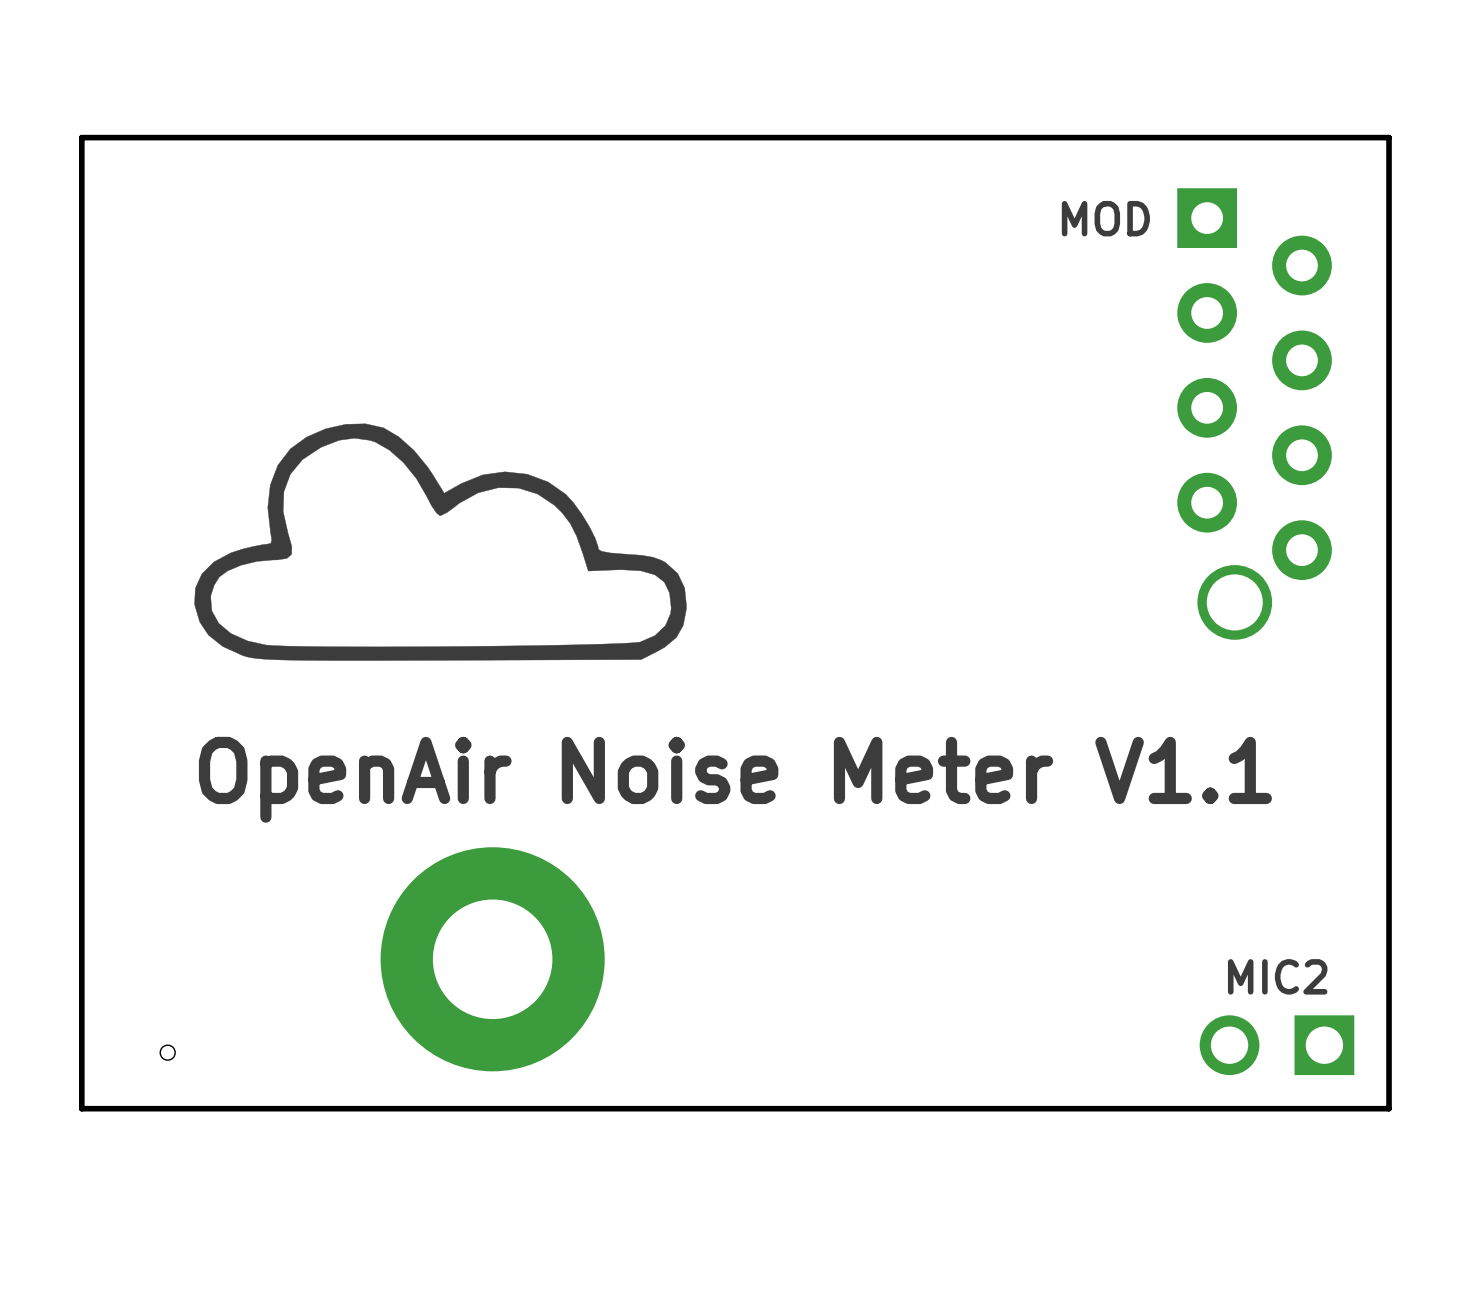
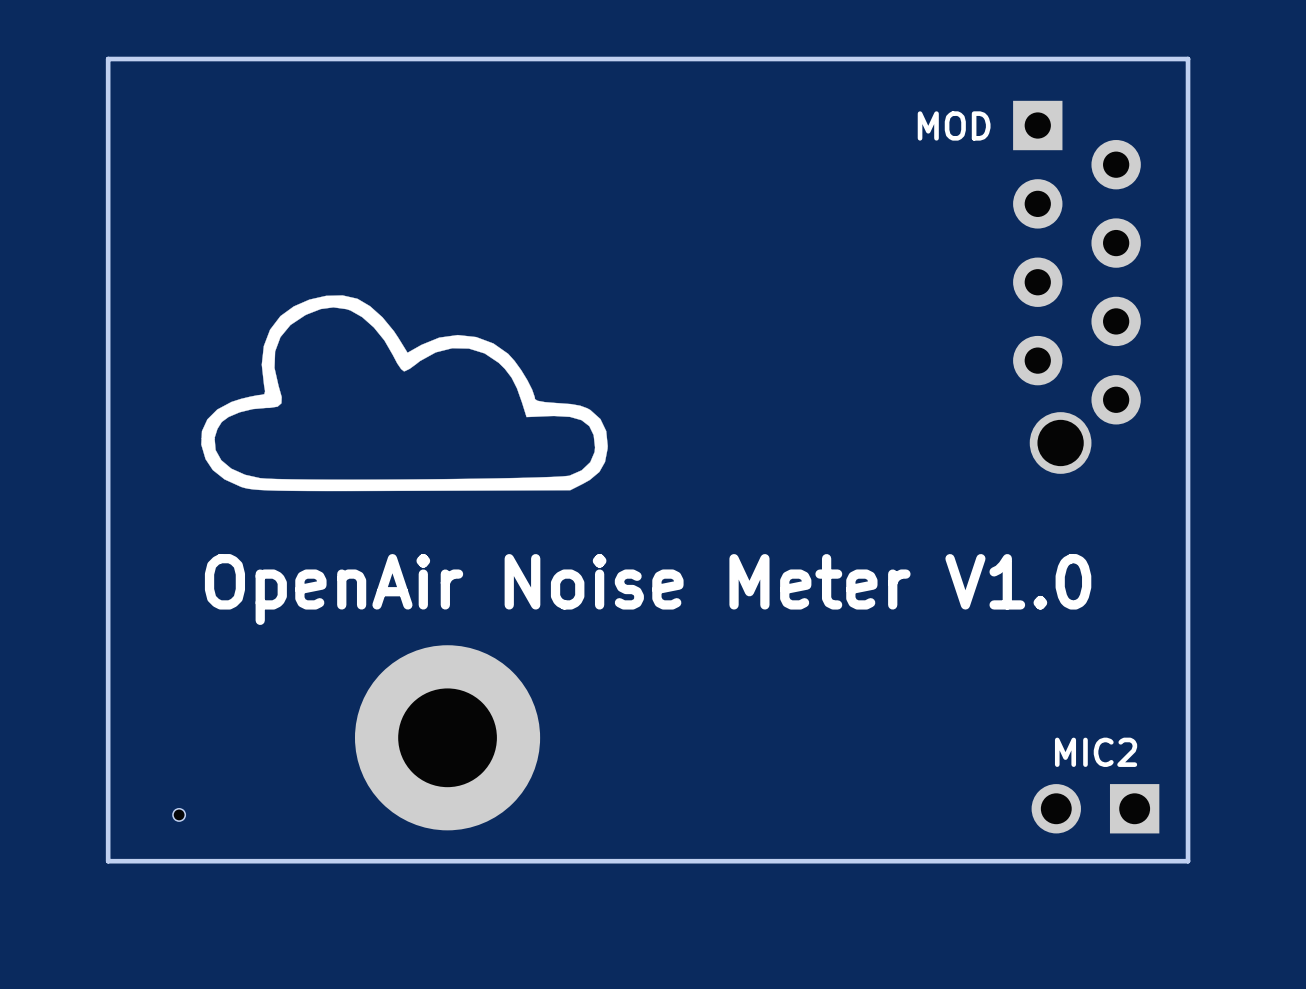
text: OpenAir Noise Meter V1.1 (735, 779) -> OpenAir Noise Meter V1.0 (648, 589)

